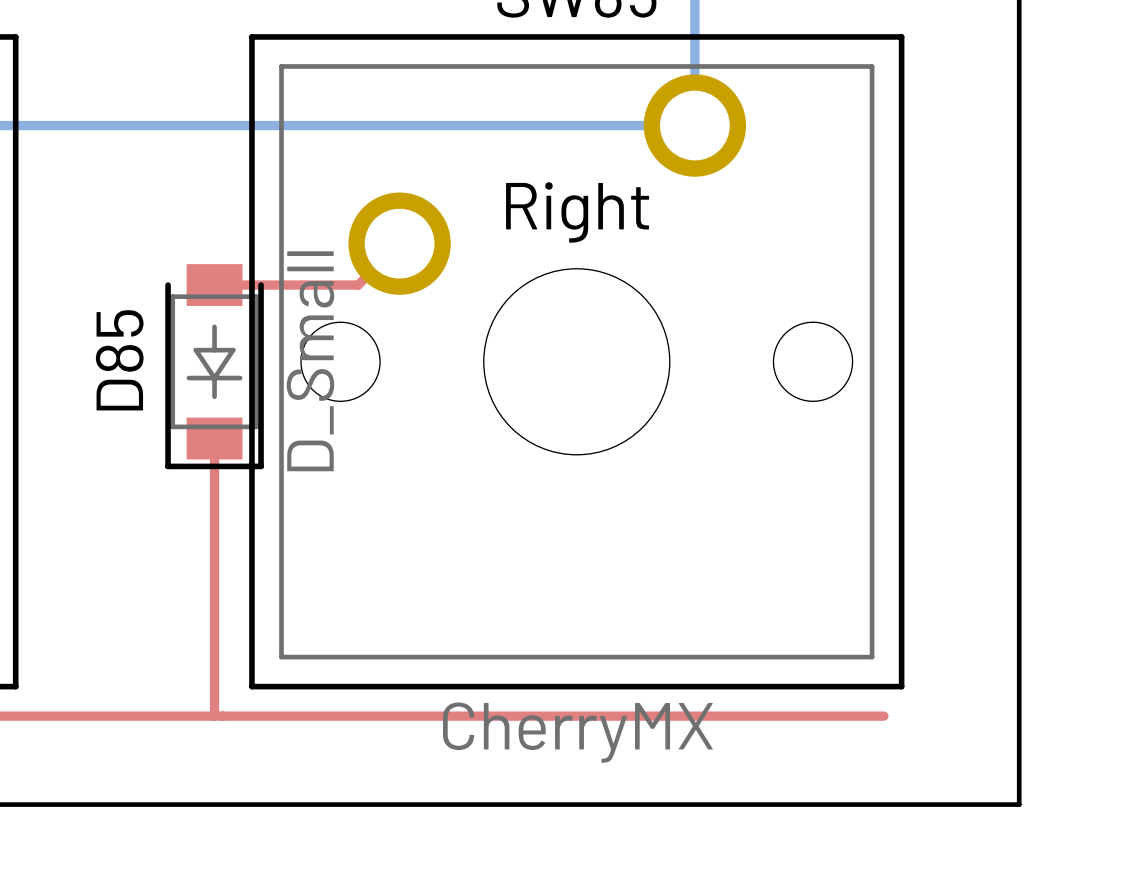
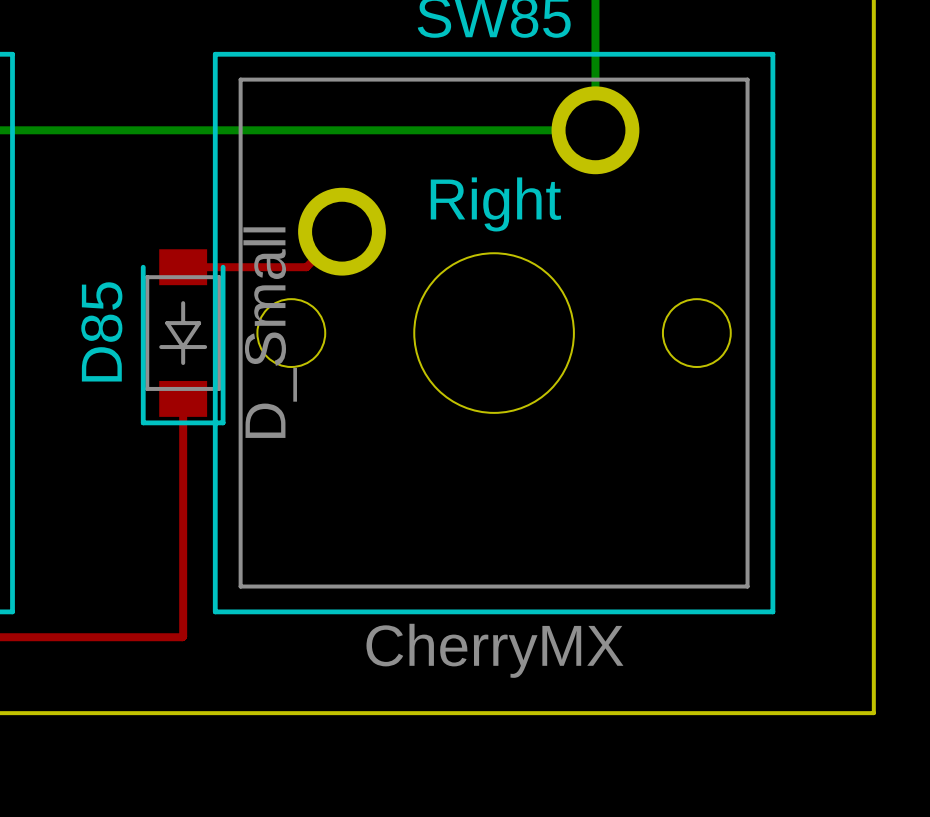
top track: (213, 716) (883, 716) -> none

